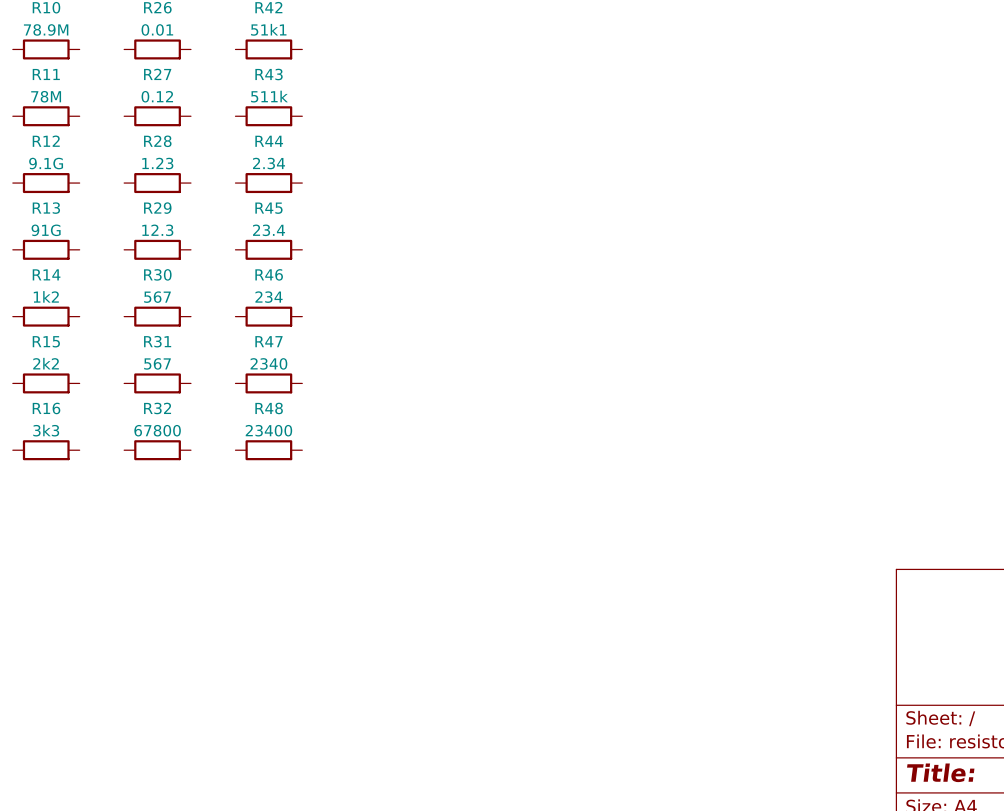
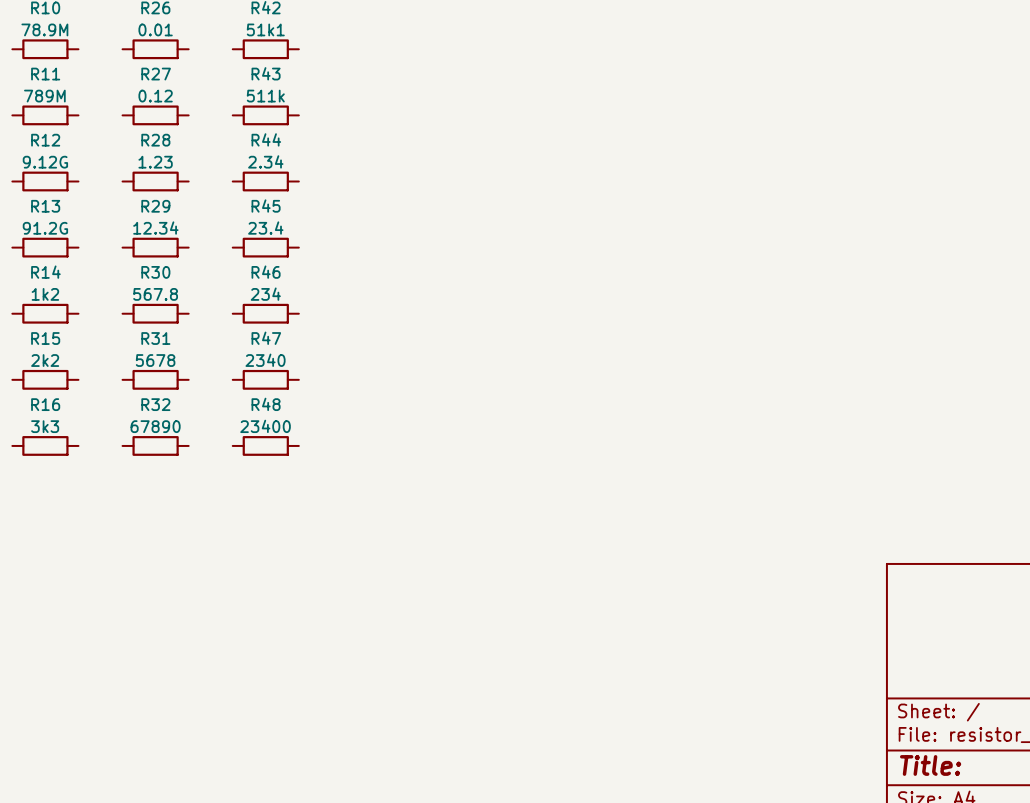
R11 value: 78M (46, 96) -> 789M (44, 96)
R12 value: 9.1G (46, 163) -> 9.12G (45, 162)
R13 value: 91G (46, 230) -> 91.2G (45, 228)
R29 value: 12.3 (157, 230) -> 12.34 (155, 228)
R30 value: 567 (157, 297) -> 567.8 (155, 294)
R31 value: 567 (157, 363) -> 5678 (155, 360)
R32 value: 67800 (157, 430) -> 67890 (155, 426)

